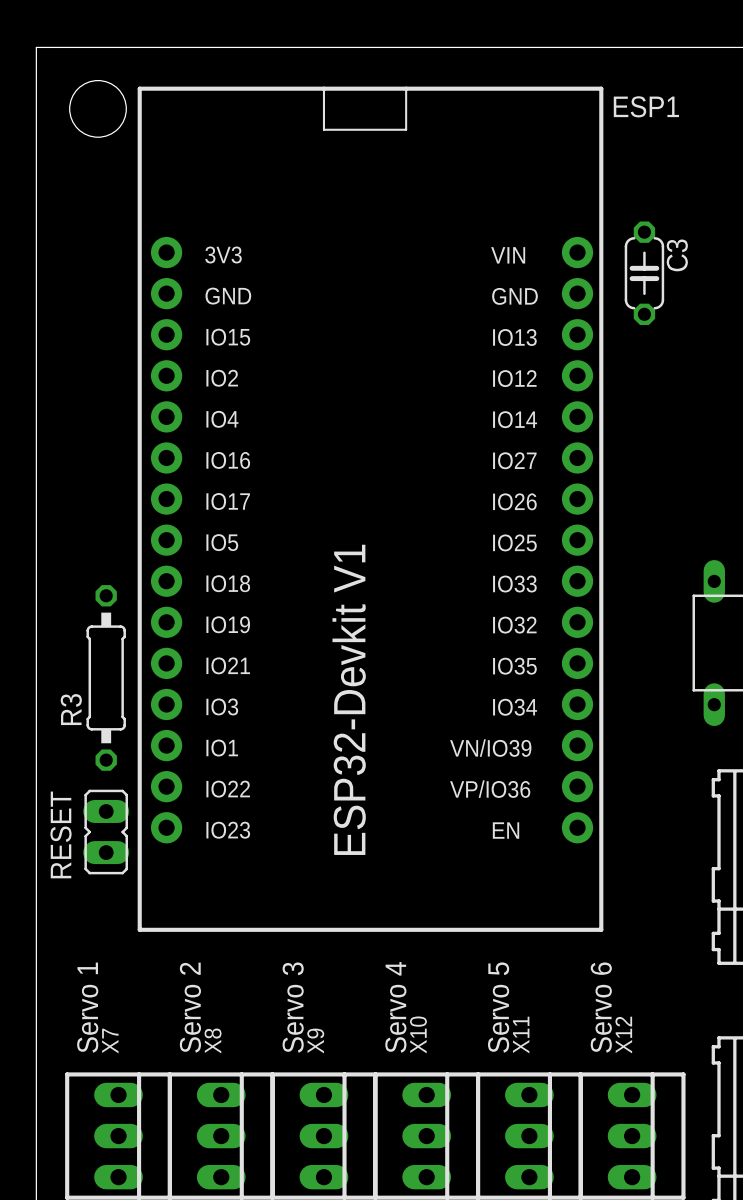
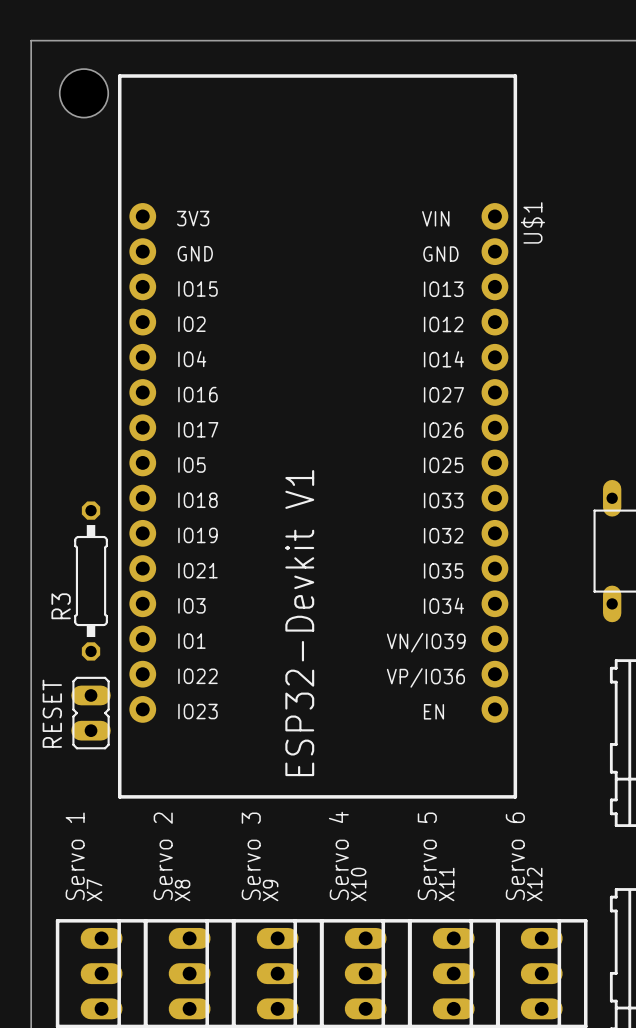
C3: (644, 273) -> none
ESP1: (370, 509) -> none
U$1: none -> (317, 436)

